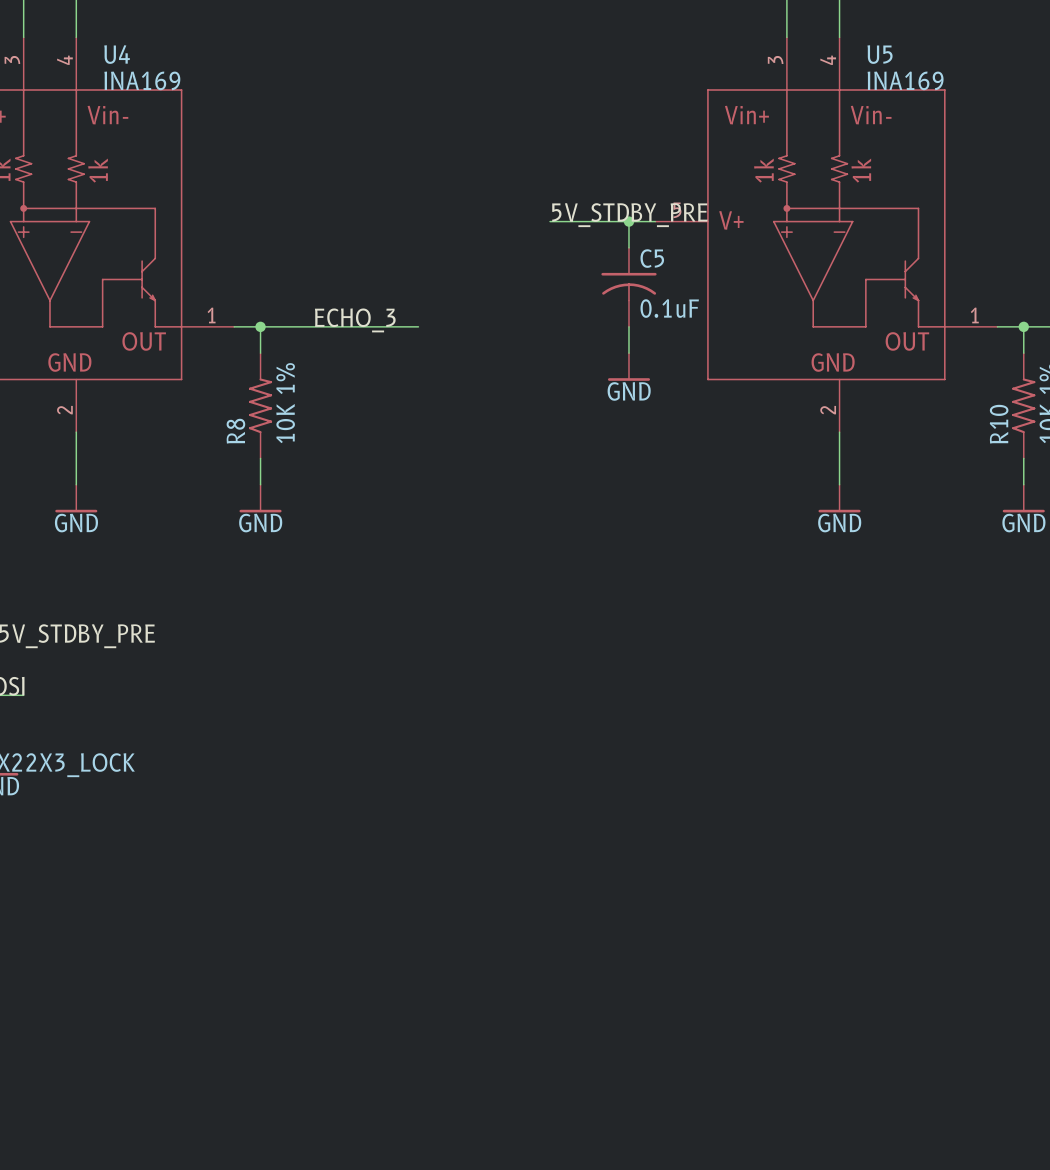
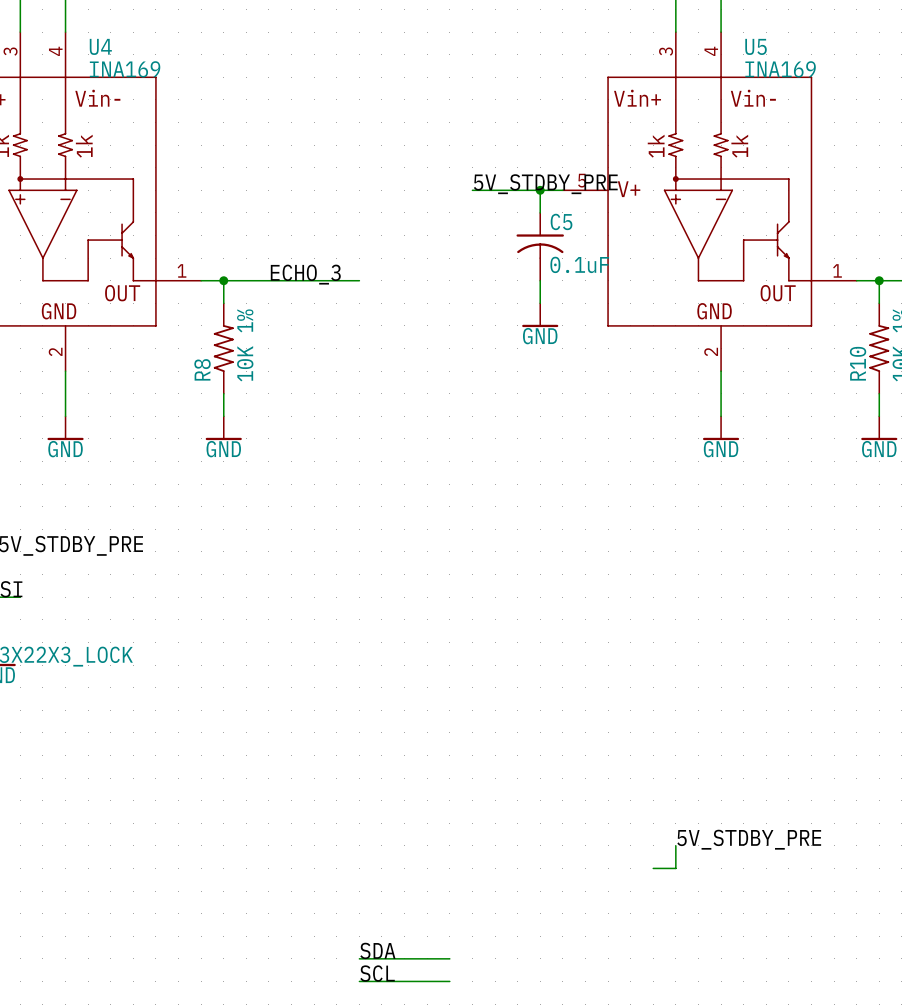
label: none -> 5V_STDBY_PRE (749, 839)
wire: none -> (675, 845) (675, 868) (653, 868)
label: none -> SDA (377, 950)
wire: none -> (359, 958) (449, 958)
label: none -> SCL (377, 973)
wire: none -> (359, 981) (449, 981)

